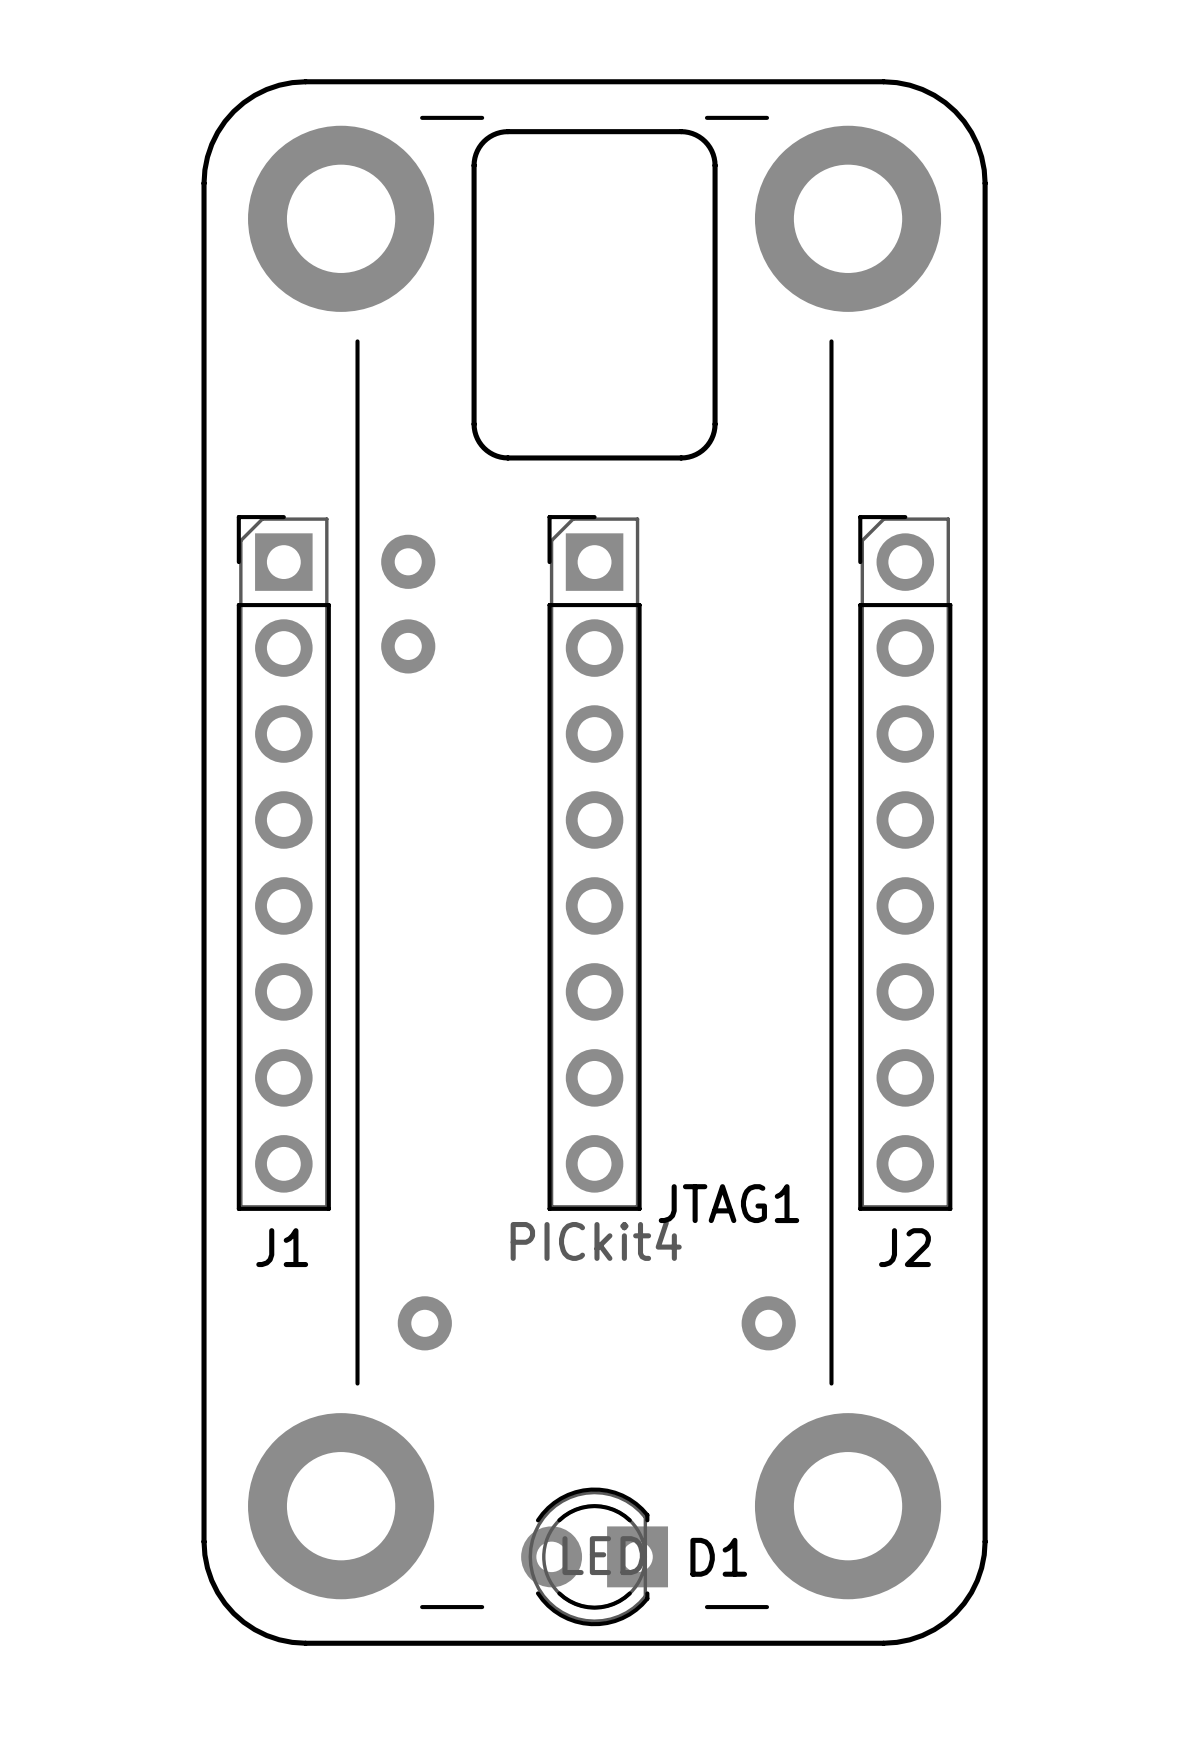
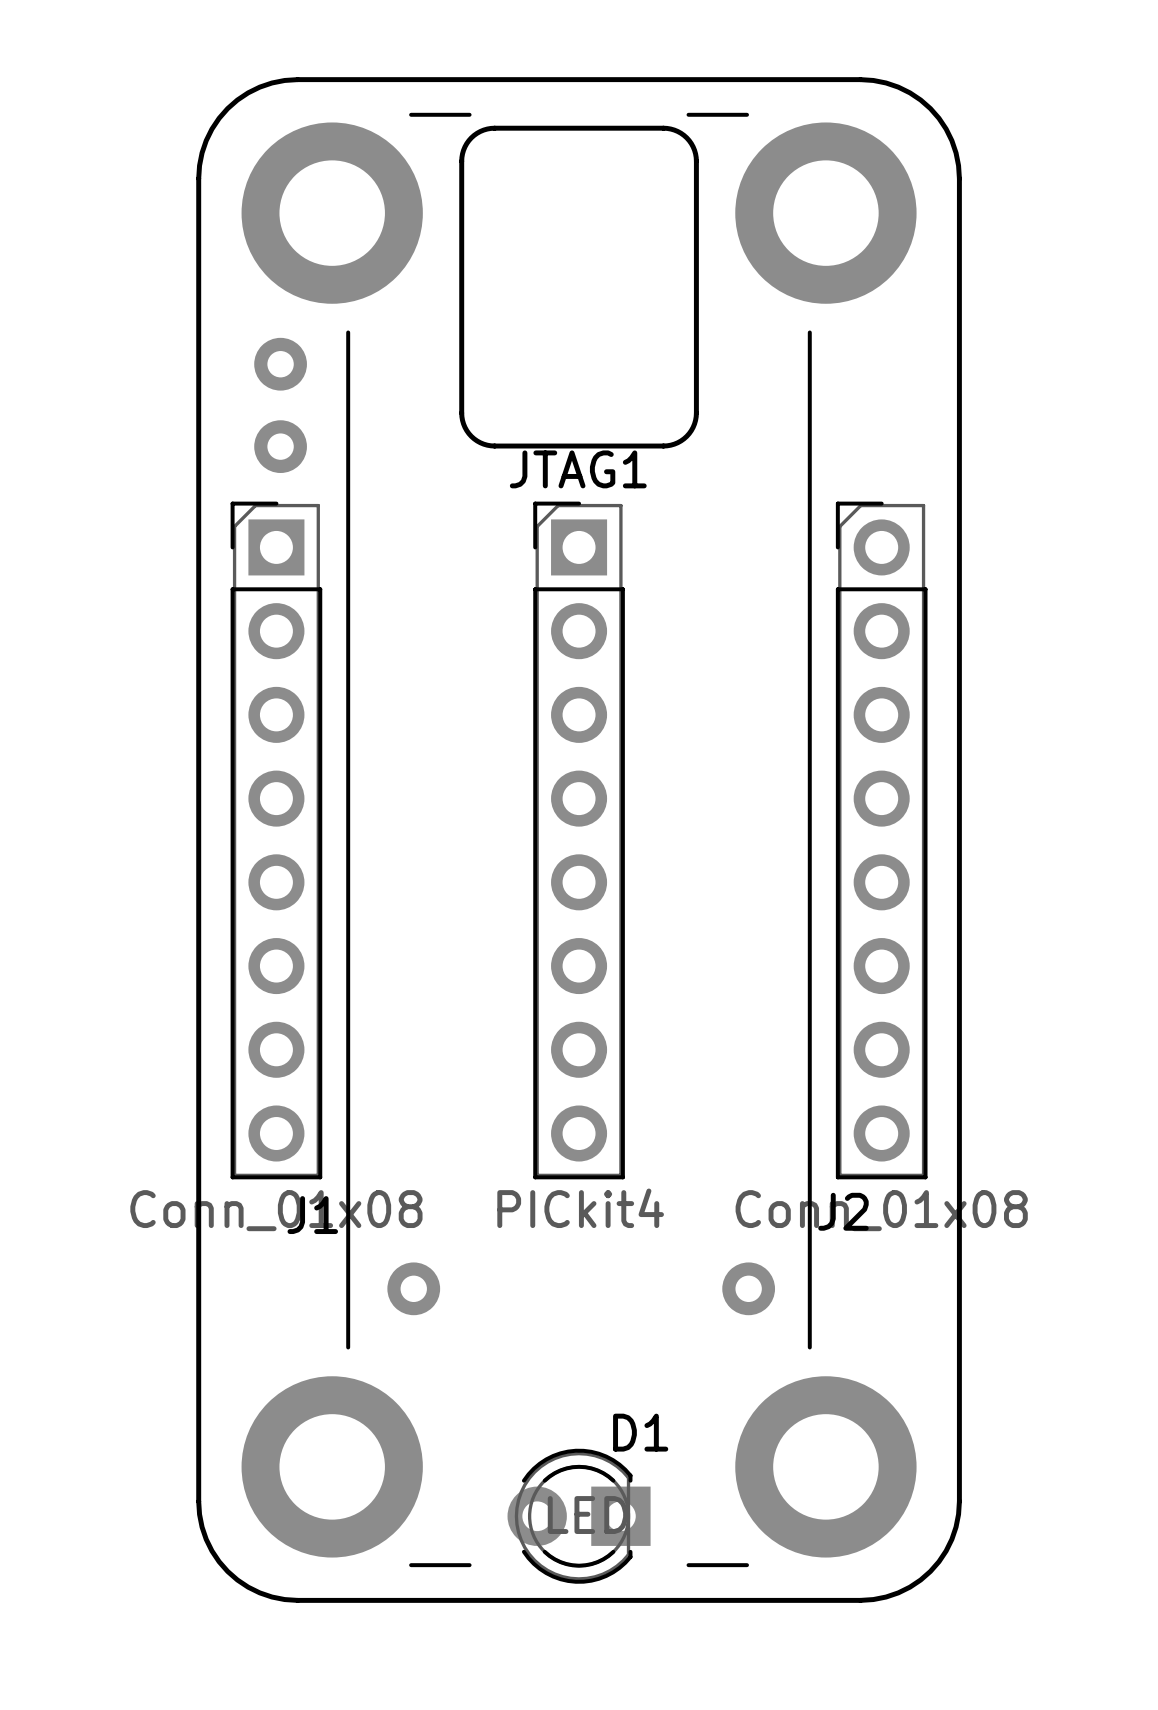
part position: (408, 604) -> (280, 405)
JTAG1 name position: JTAG1 (728, 1203) -> JTAG1 (578, 469)
J1 value: none -> Conn_01x08 (276, 1210)
J2 value: none -> Conn_01x08 (881, 1210)
J1 name position: J1 (282, 1247) -> J1 (312, 1215)
J2 name position: J2 (904, 1247) -> J2 (843, 1211)
D1 name position: D1 (718, 1557) -> D1 (640, 1432)

